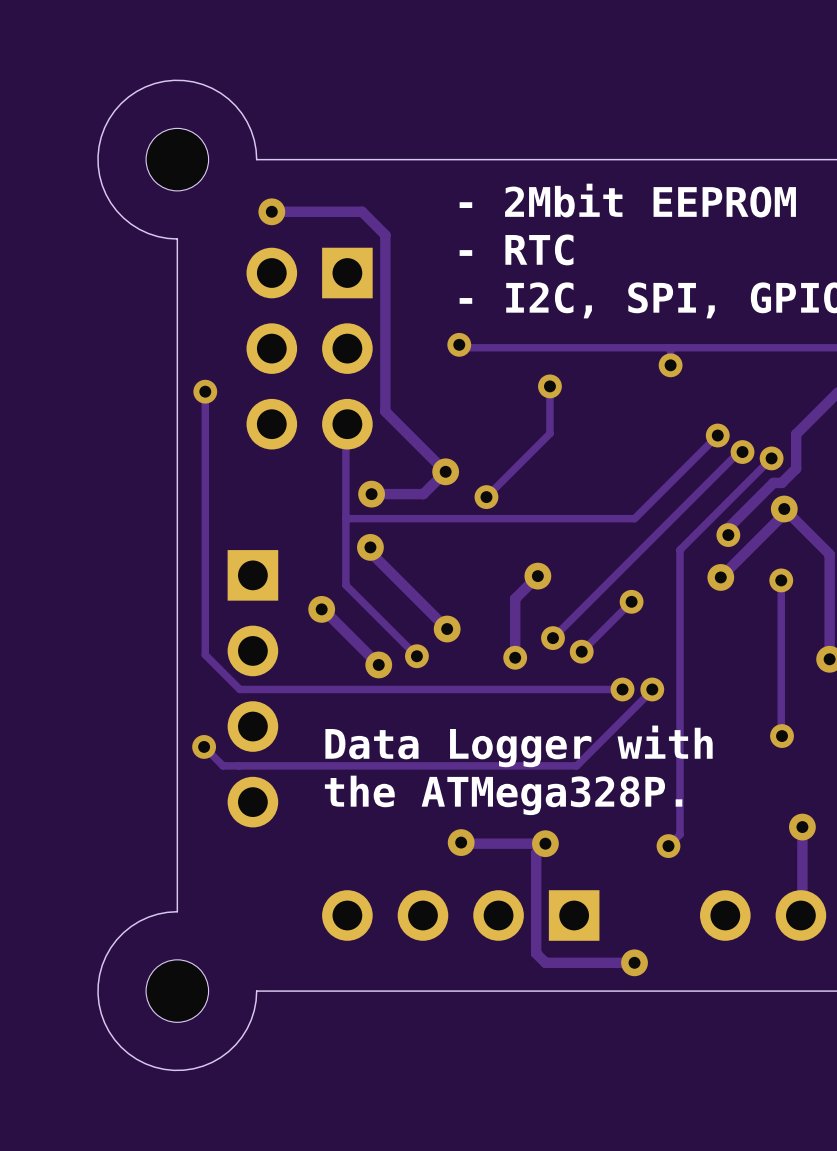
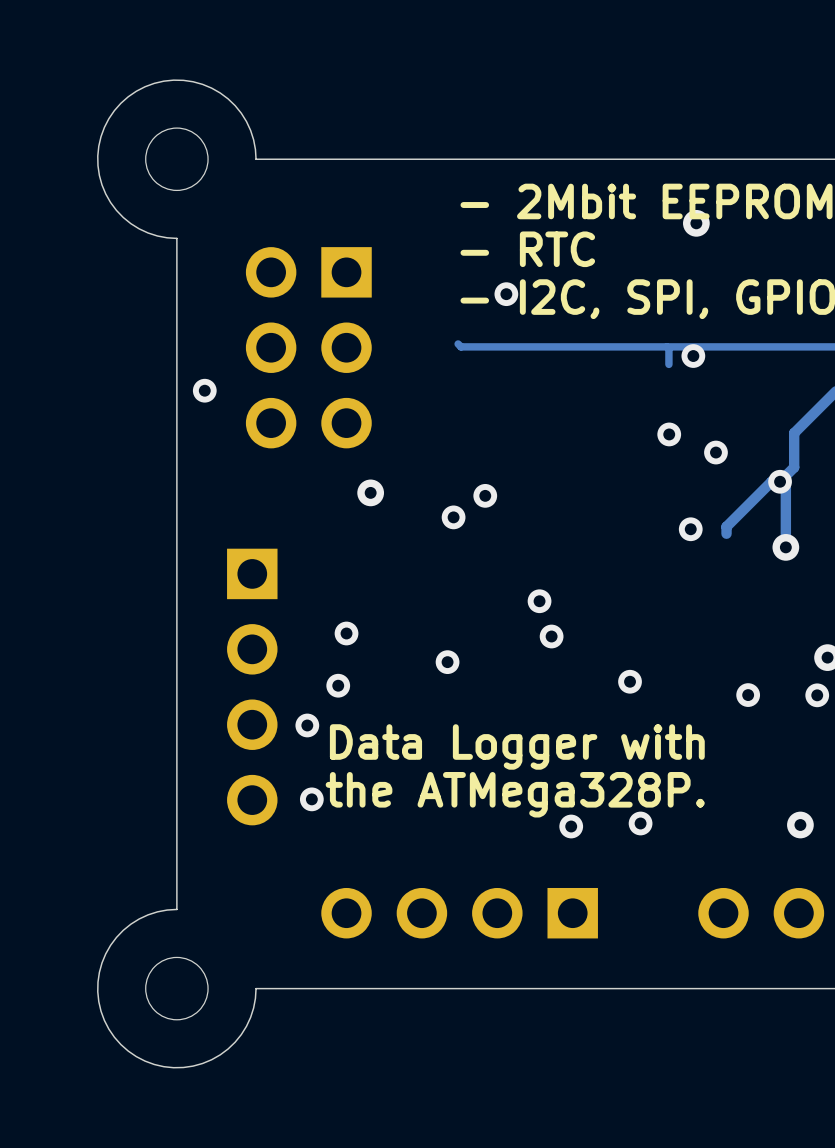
track: (271, 211) (362, 211) (385, 235) (385, 411) (445, 471) (423, 494) (371, 494) -> none
via: (271, 211) -> none
via: none -> (696, 223)
via: none -> (506, 294)
via: (459, 344) -> none
via position: (670, 365) -> (693, 356)
track: (549, 386) (549, 433) (486, 497) -> none
via: (549, 386) -> none
track: (205, 391) (205, 654) (239, 689) (622, 689) -> none
track: (347, 424) (347, 441) (344, 444) (345, 585) (416, 656) -> none
via: none -> (669, 434)
track: (717, 435) (634, 518) (345, 518) -> none
via position: (717, 435) -> (715, 452)
track: (742, 452) (739, 452) (552, 638) -> none
via: (742, 452) -> none
track: (771, 458) (679, 550) (679, 834) (668, 846) -> none
via: (771, 458) -> none
via: (445, 471) -> none
track: none -> (780, 481) (785, 487) (785, 547)
via: none -> (780, 481)
via: (784, 509) -> none
via: none -> (453, 517)
via position: (728, 535) -> (690, 529)
track: (370, 547) (370, 552) (447, 629) -> none
via: (370, 547) -> none
via: none -> (785, 547)
track: (537, 576) (515, 598) (515, 657) -> none
via: (537, 576) -> none
track: (720, 577) (784, 513) (784, 509) (829, 554) (829, 659) -> none
via: (720, 577) -> none
track: (781, 580) (782, 736) -> none
via: (781, 580) -> none
track: (631, 601) (581, 651) -> none
via: (631, 601) -> none
via: none -> (539, 601)
track: (321, 609) (378, 664) -> none
via: (321, 609) -> none
via: (447, 629) -> none
via: none -> (346, 633)
via: (581, 651) -> none
via position: (416, 656) -> (447, 662)
via: (515, 657) -> none
via: (378, 664) -> none
via: none -> (630, 681)
via: none -> (338, 685)
via: (622, 689) -> none
track: (652, 689) (576, 765) (223, 765) (204, 746) -> none
via: (652, 689) -> none
via: none -> (748, 695)
via: none -> (817, 695)
via: none -> (307, 725)
via: (782, 736) -> none
via: (204, 746) -> none
via: none -> (311, 799)
track: (802, 827) (800, 915) -> none
via: none -> (571, 826)
track: (461, 842) (545, 843) (536, 852) (536, 953) (545, 962) (634, 962) -> none
via: (461, 842) -> none
via: (545, 843) -> none
via position: (668, 846) -> (640, 823)
via: (634, 962) -> none

